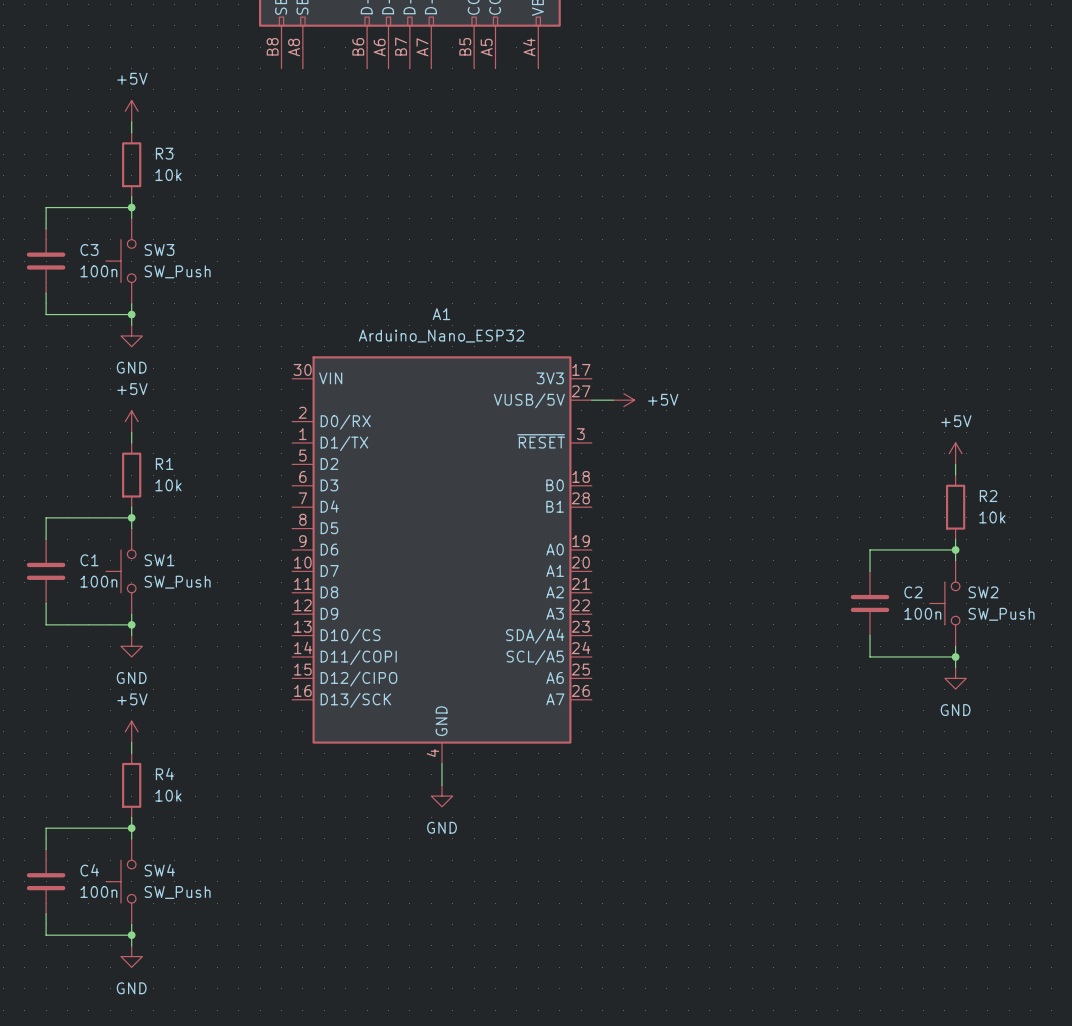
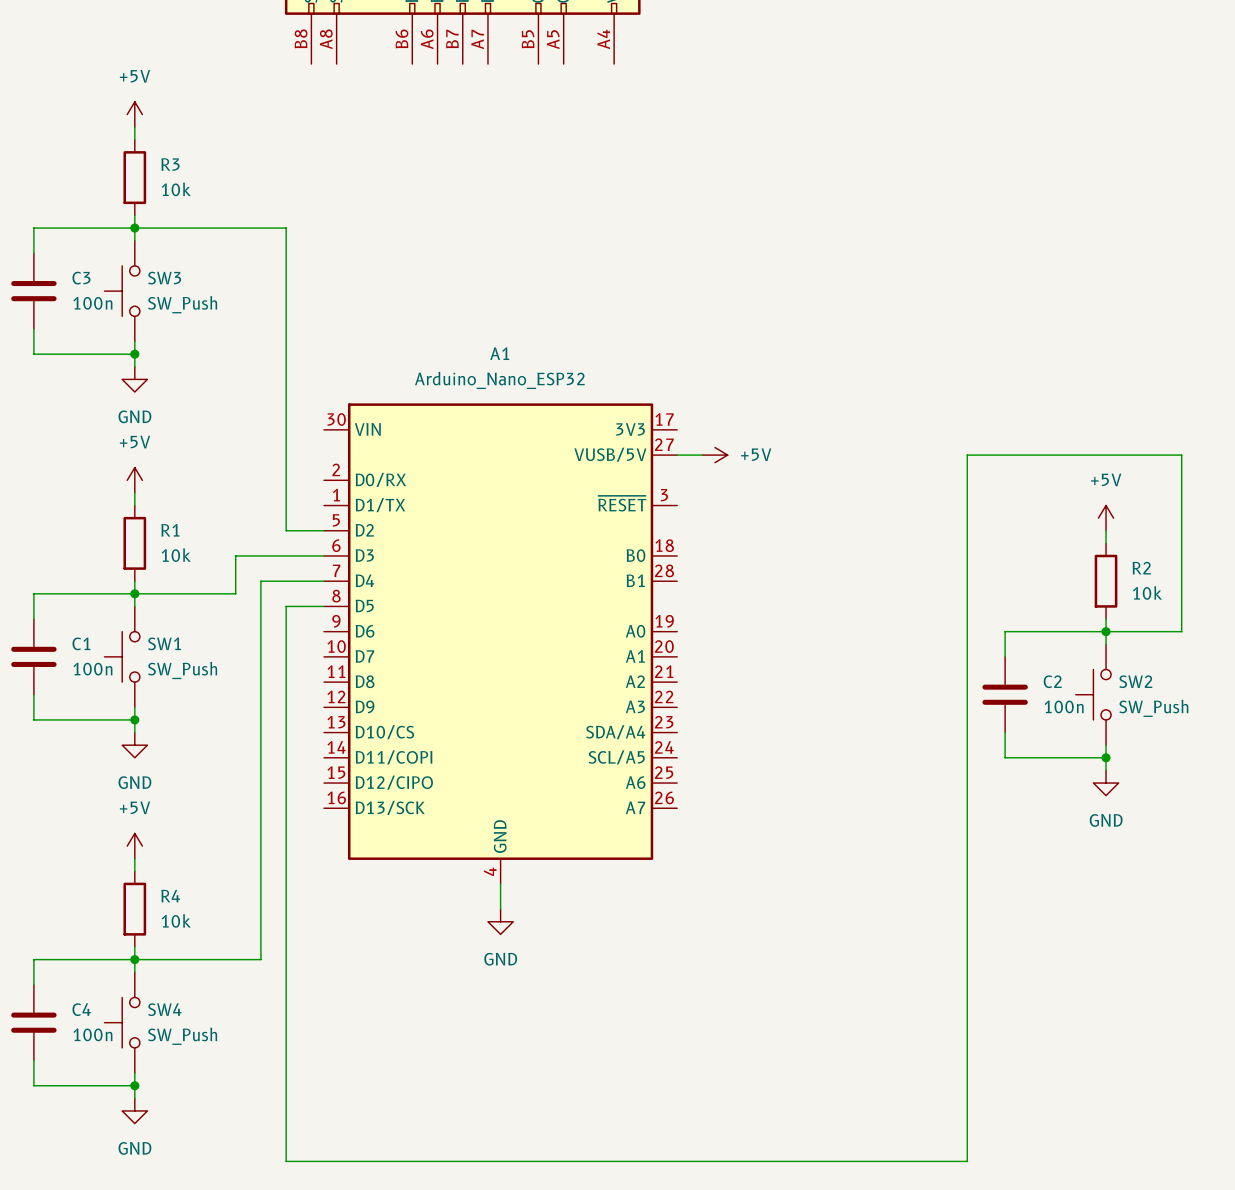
wire: none -> (134, 228) (286, 228) (286, 530) (324, 530)
wire: none -> (324, 555) (235, 555) (235, 593) (134, 593)
wire: none -> (324, 581) (260, 581) (260, 959) (134, 959)
wire: none -> (324, 606) (286, 606) (286, 1161) (967, 1161) (967, 455) (1181, 455) (1181, 631) (1106, 631)

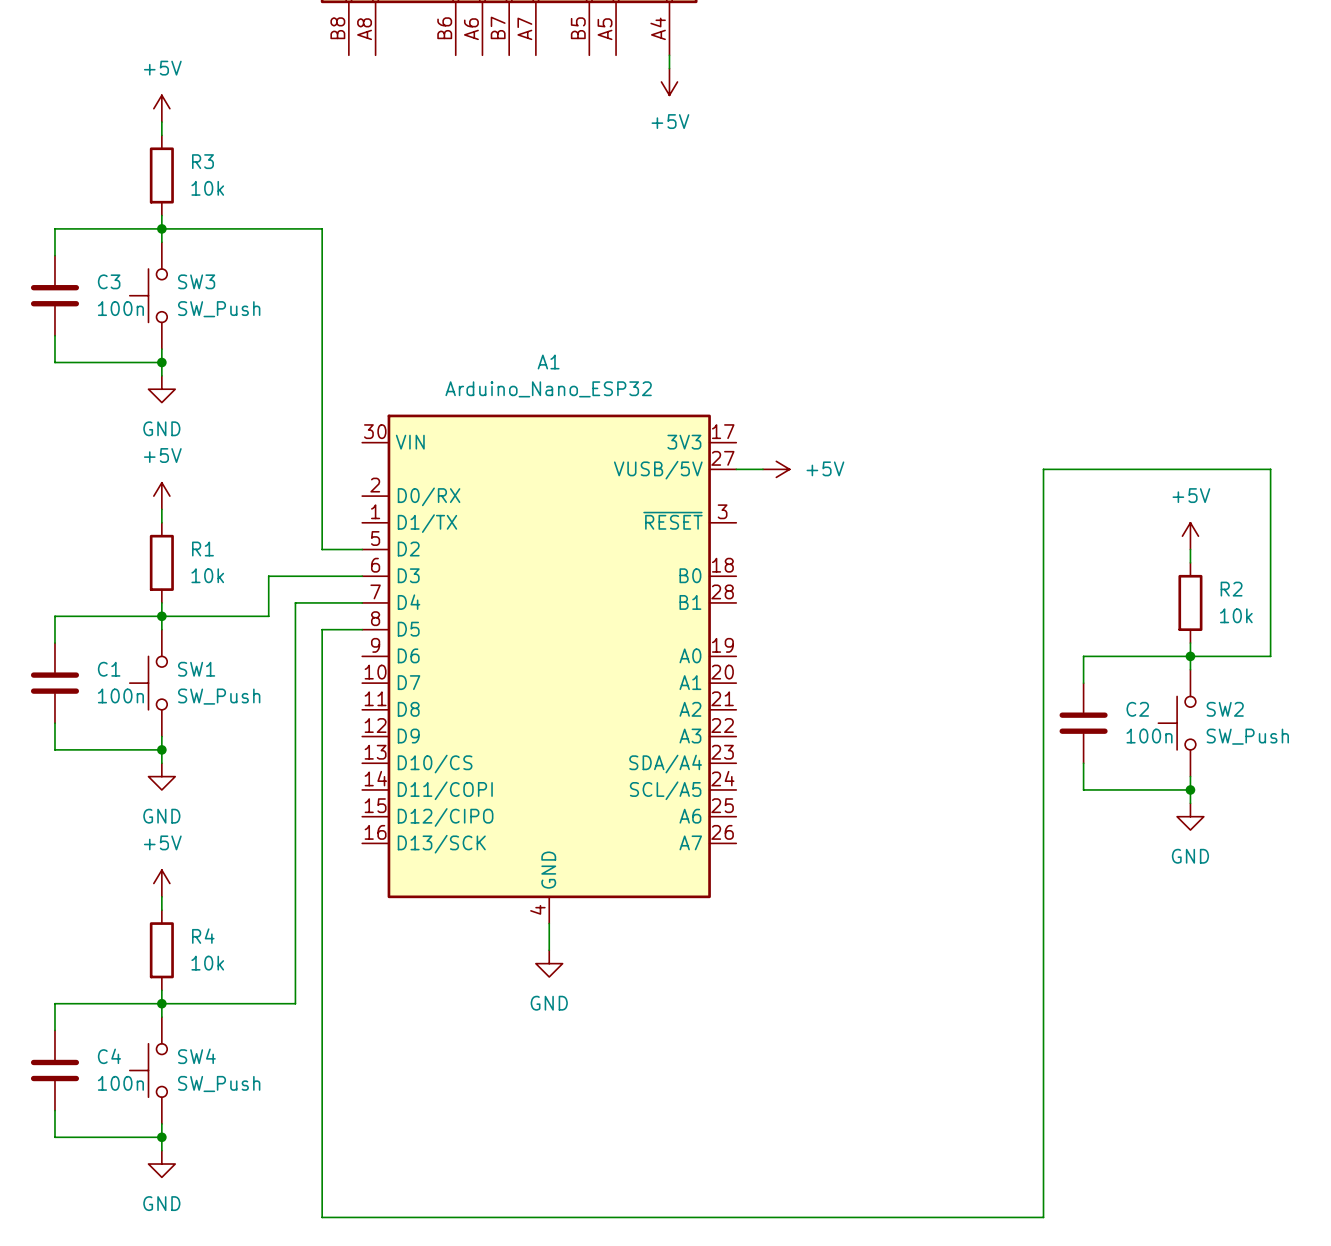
wire: none -> (669, 55) (669, 68)
power symbol: none -> +5V (669, 81)

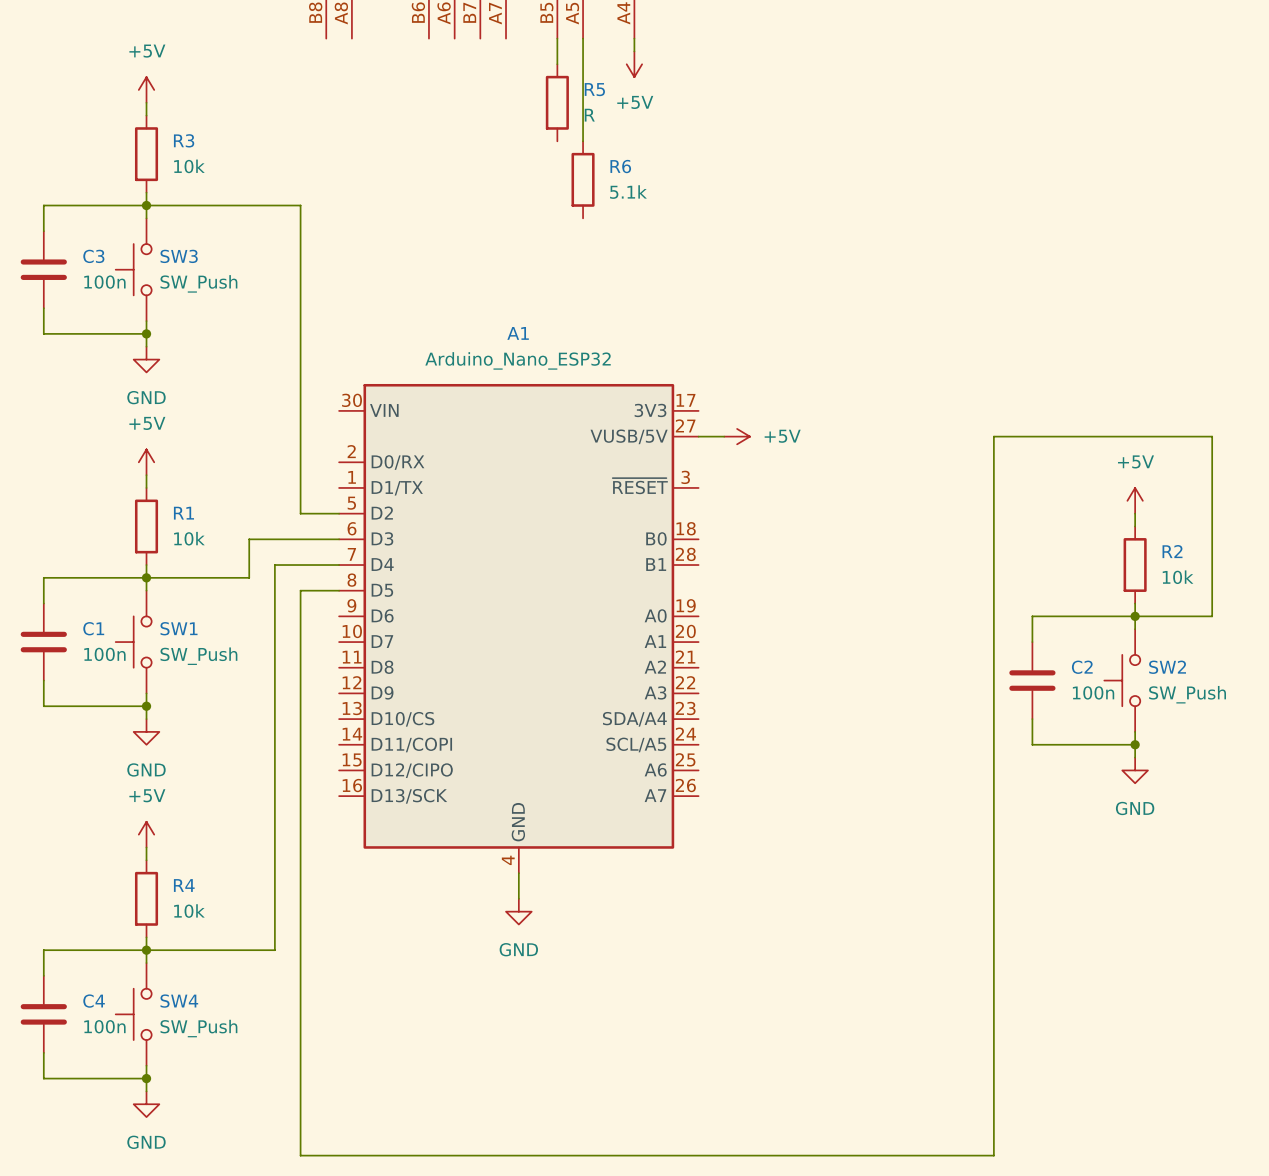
wire: none -> (557, 38) (557, 64)
wire: none -> (583, 38) (583, 141)
R5: none -> R (557, 102)
R6: none -> 5.1k (583, 179)

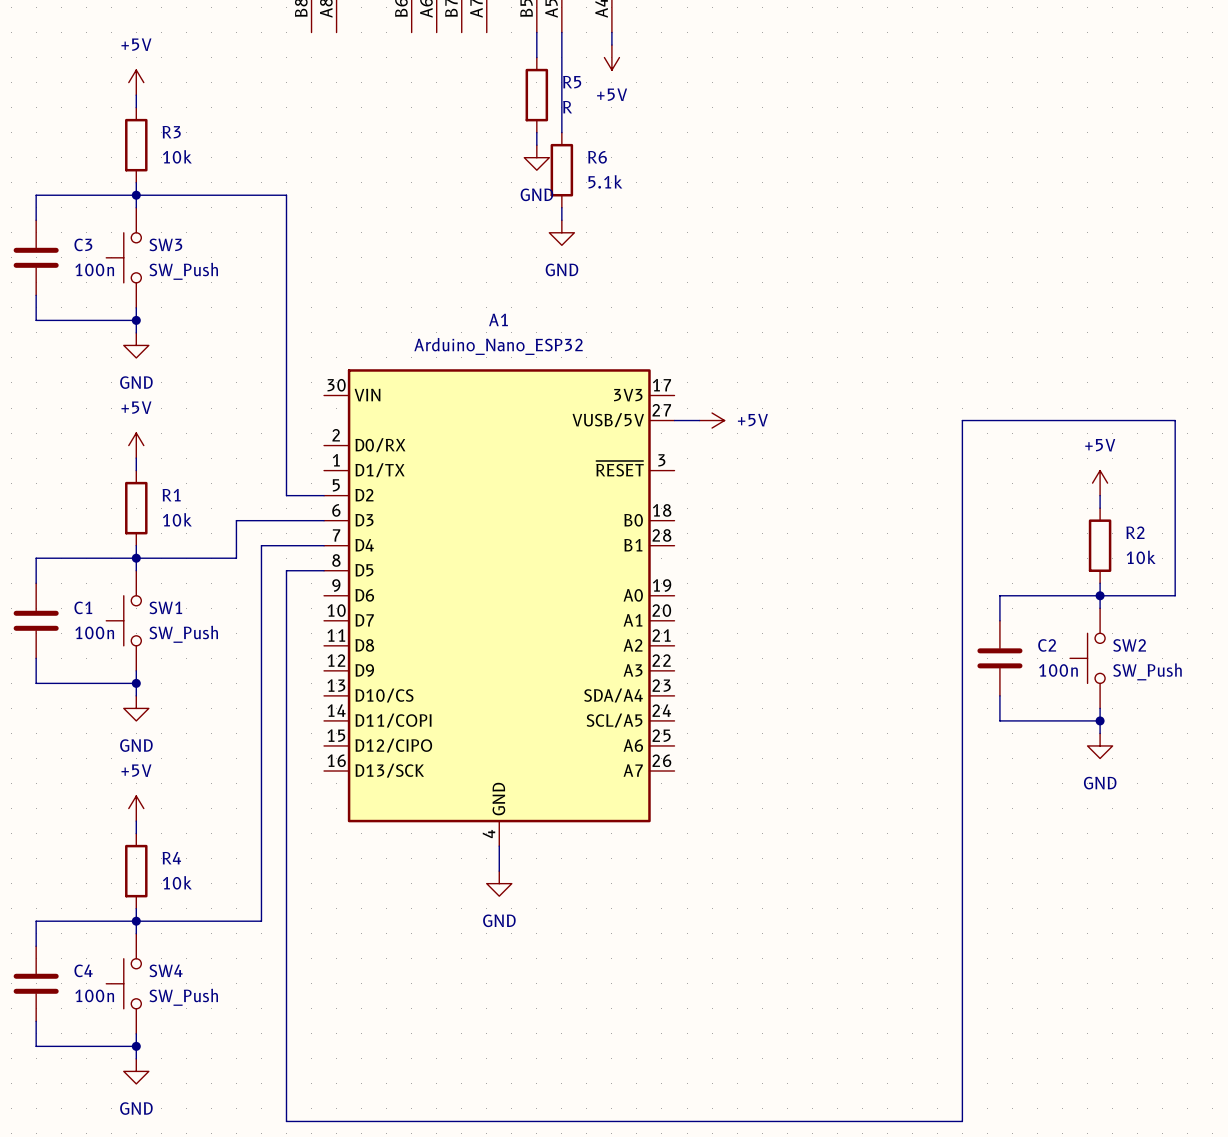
wire: none -> (536, 132) (536, 145)
power symbol: none -> GND (536, 157)
wire: none -> (561, 207) (561, 220)
power symbol: none -> GND (561, 232)

